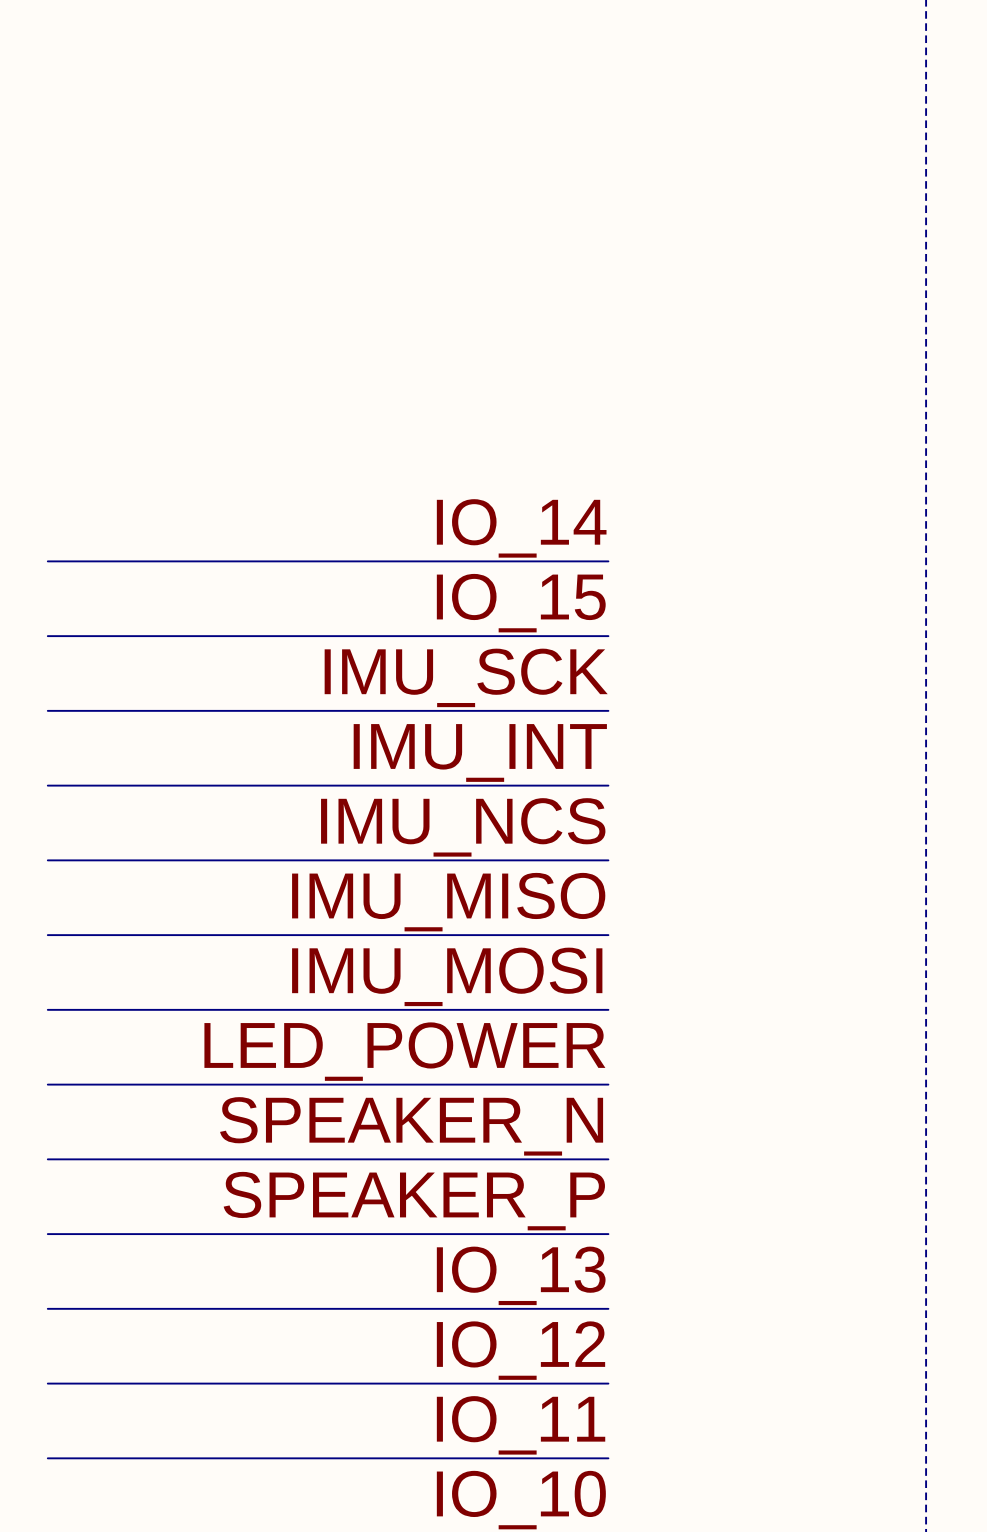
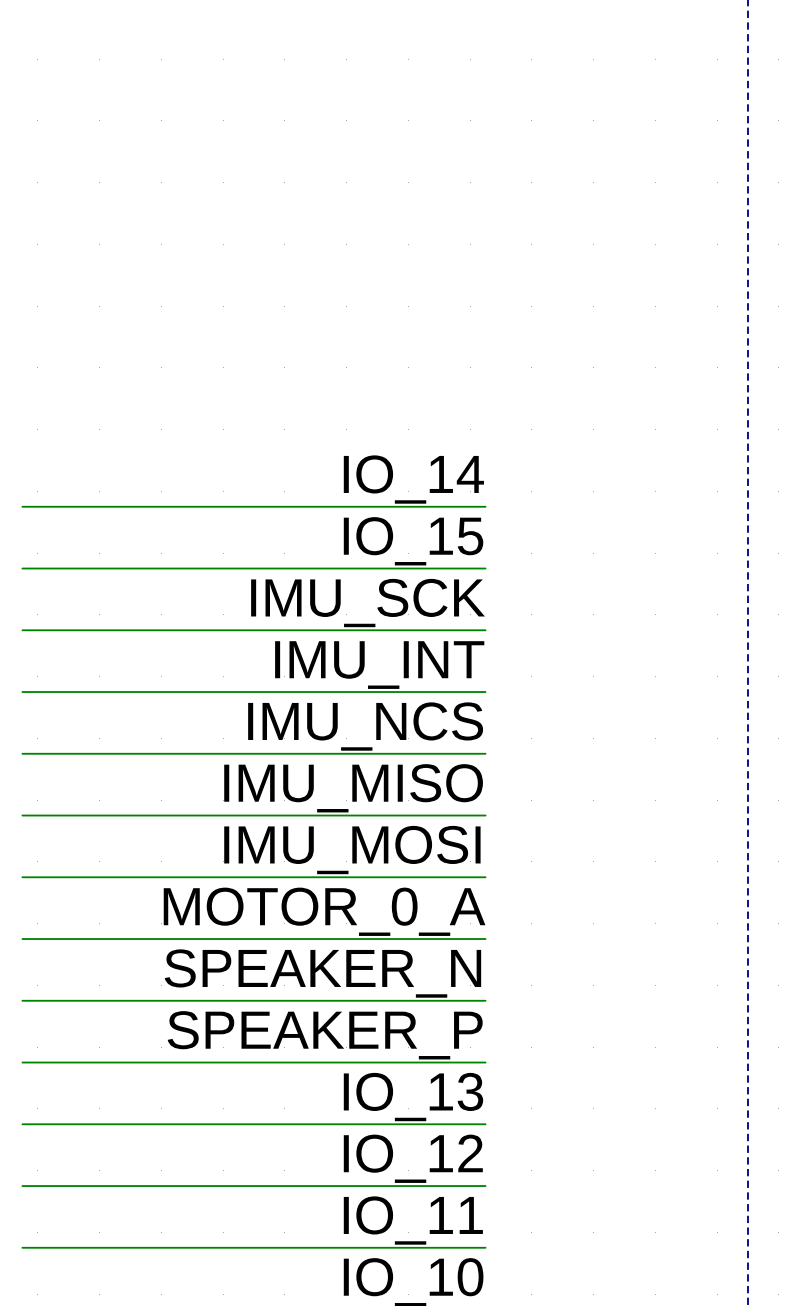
label: LED_POWER (404, 1051) -> MOTOR_0_A (324, 911)

